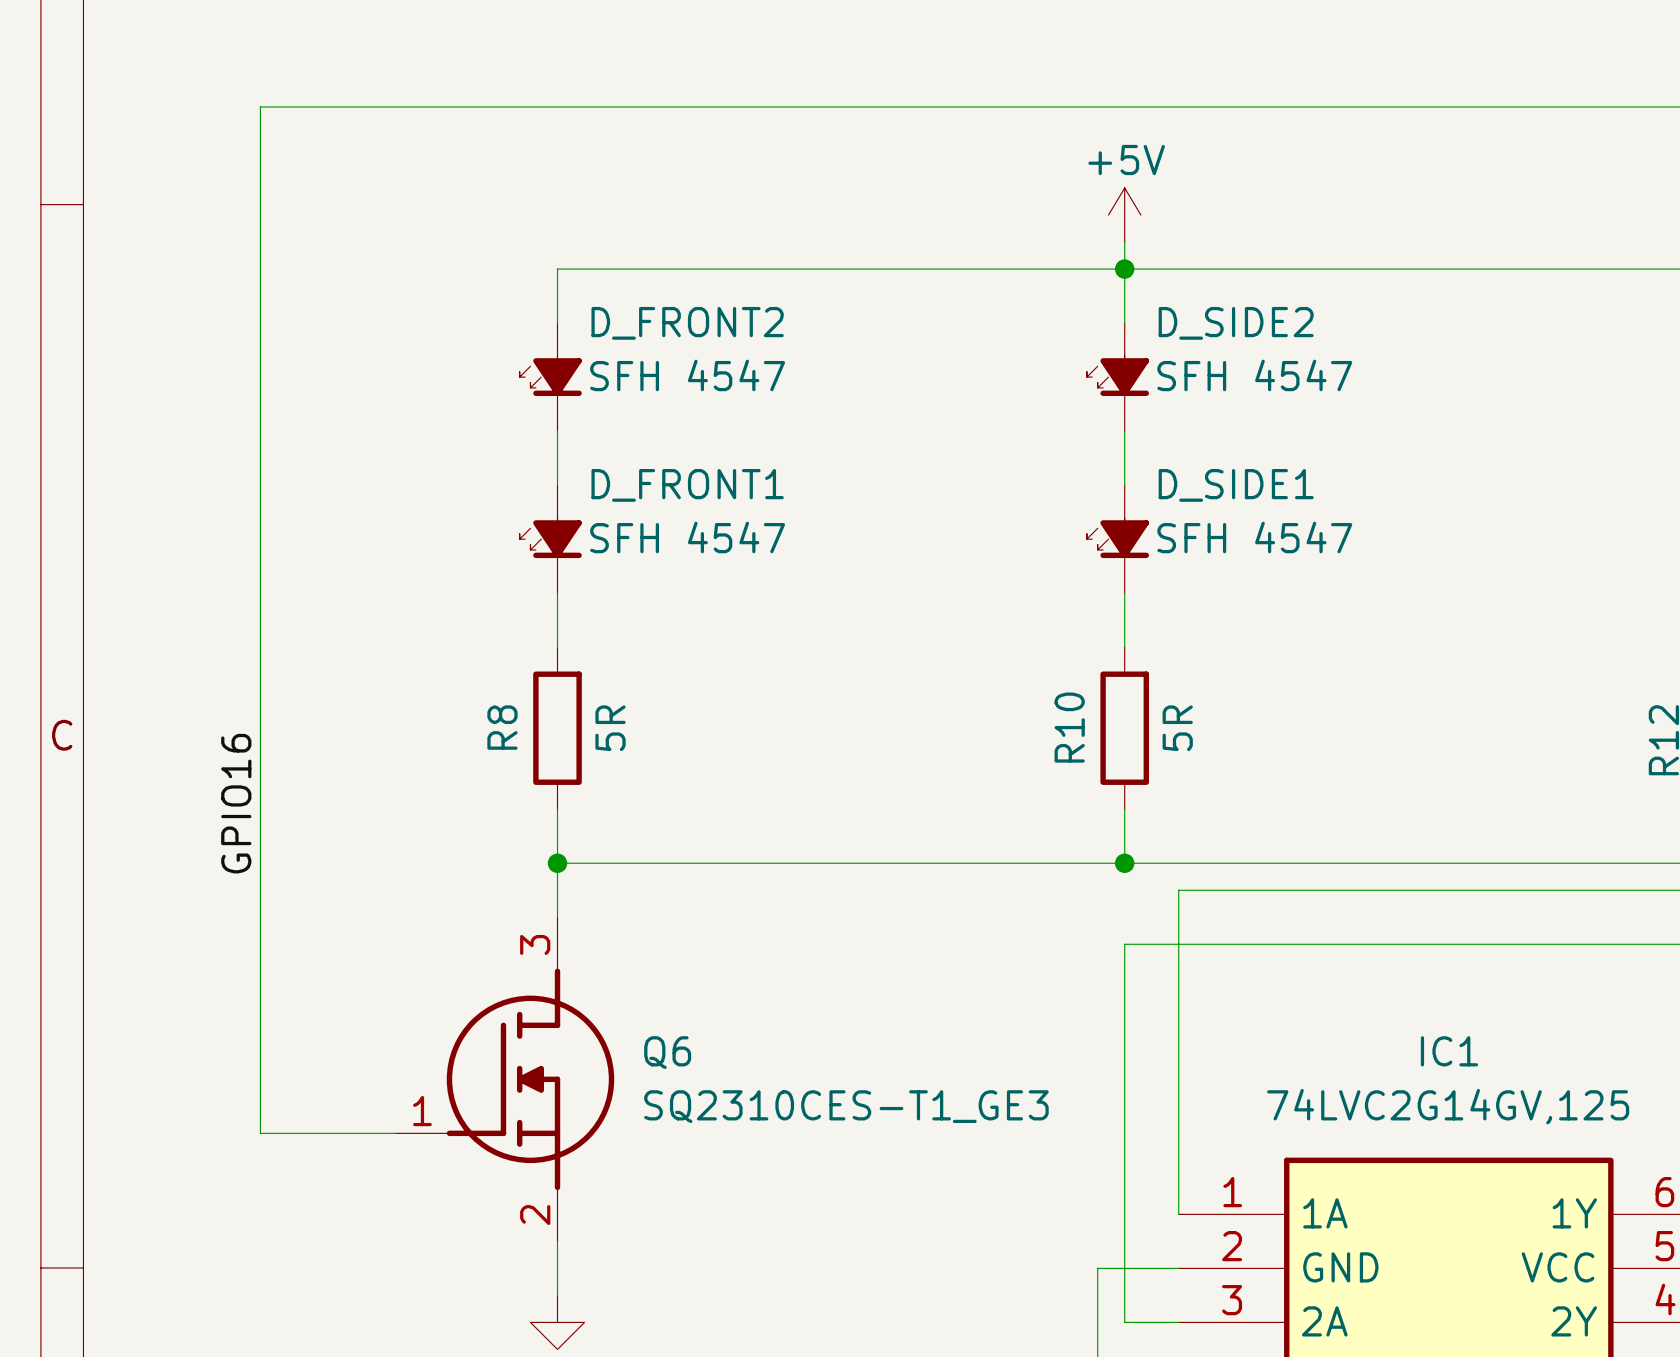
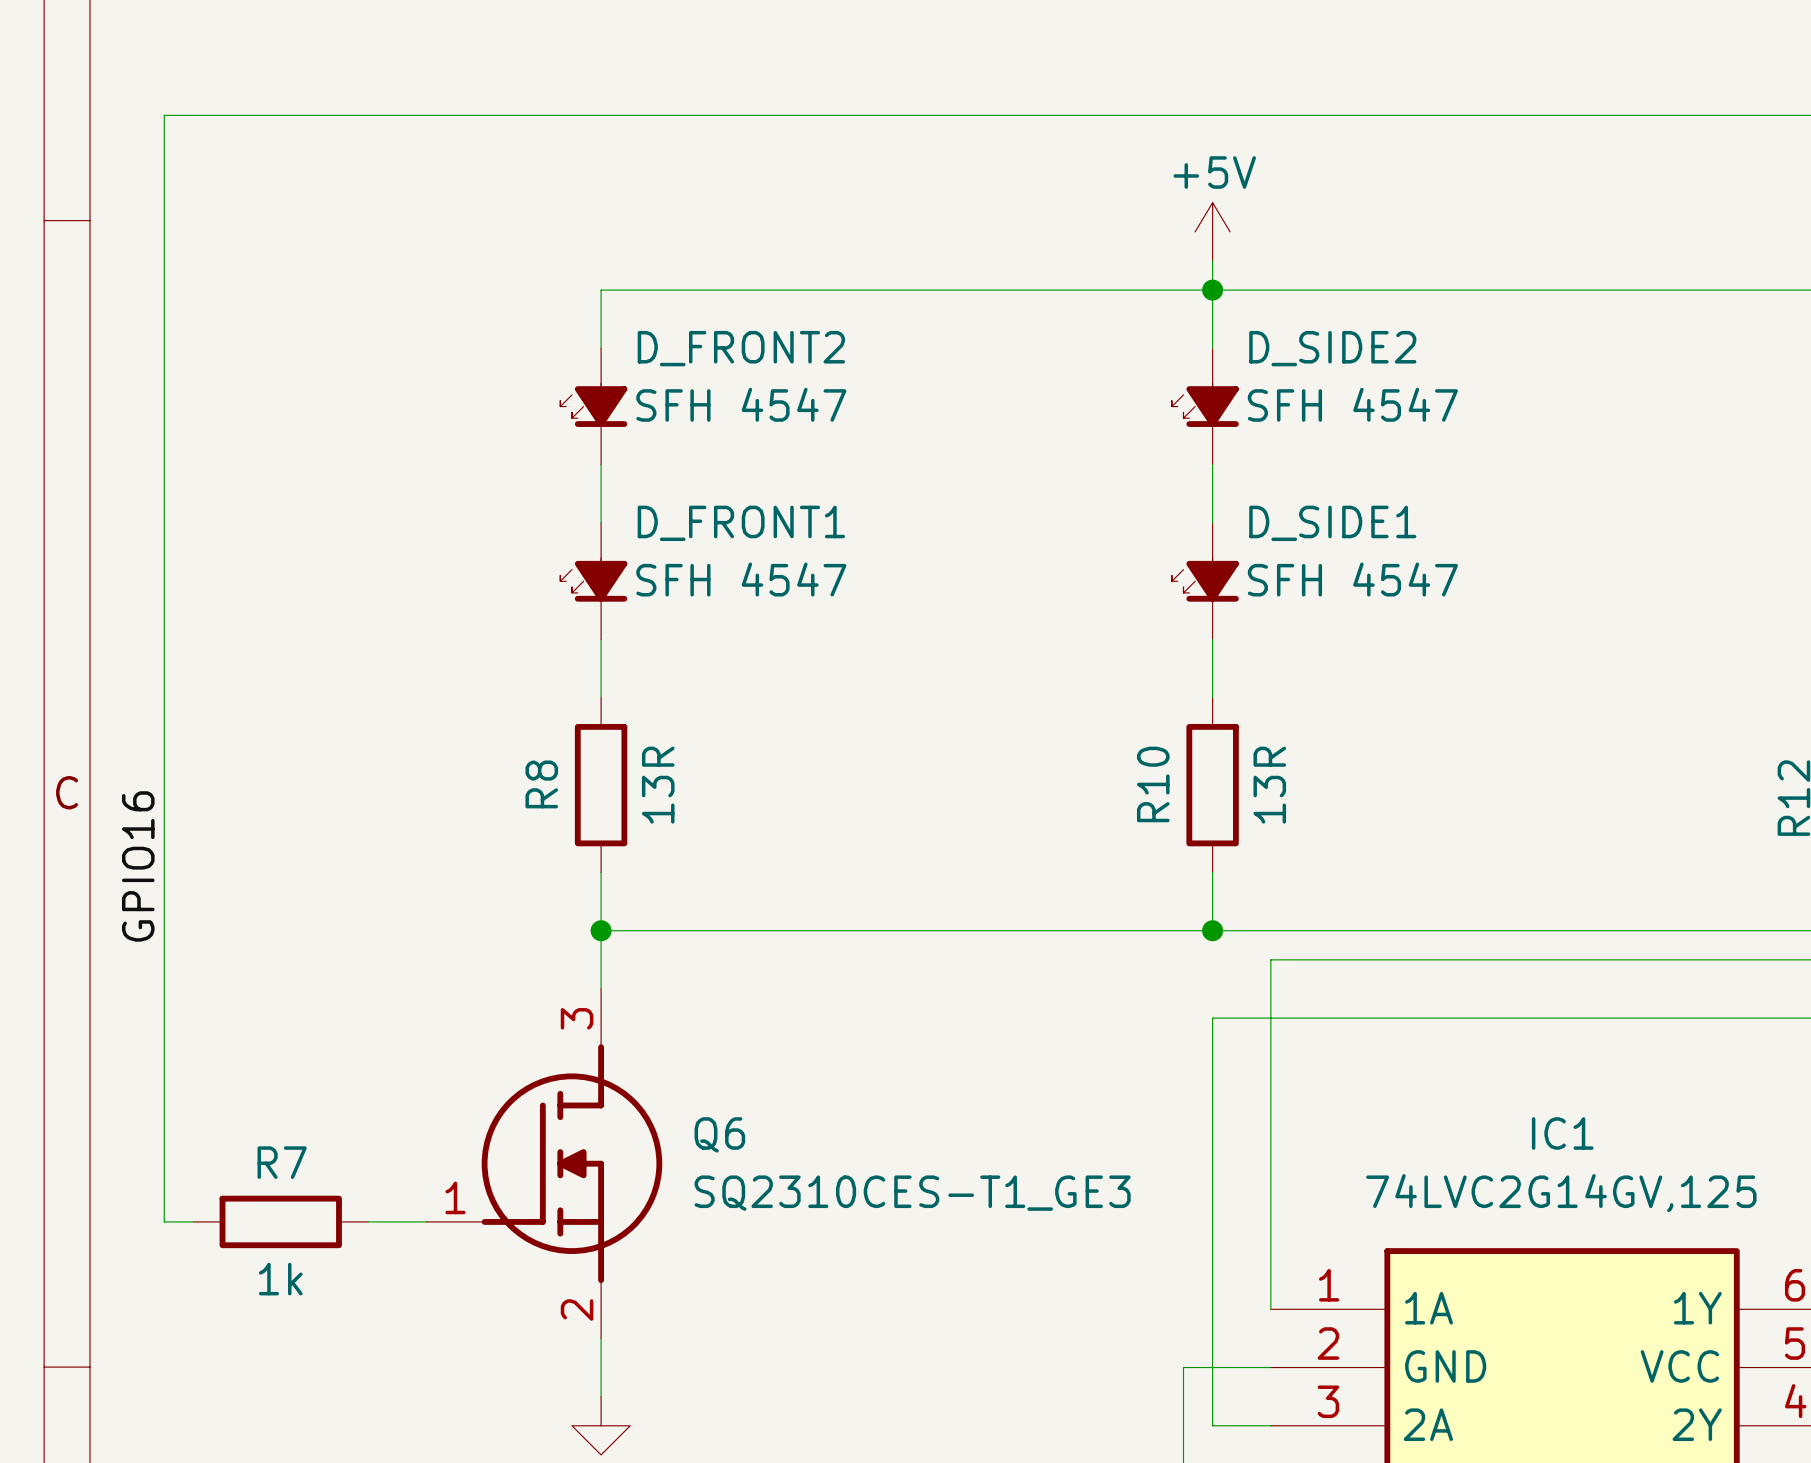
wire: (260, 107) (260, 1133) (341, 1133) -> (280, 115) (164, 115) (164, 1221) (193, 1221)
R8 value: 5R (610, 728) -> 13R (658, 785)
R10 value: 5R (1177, 728) -> 13R (1269, 785)
label position: GPIO16 (236, 803) -> GPIO16 (138, 866)
R7: none -> 1k (280, 1221)

